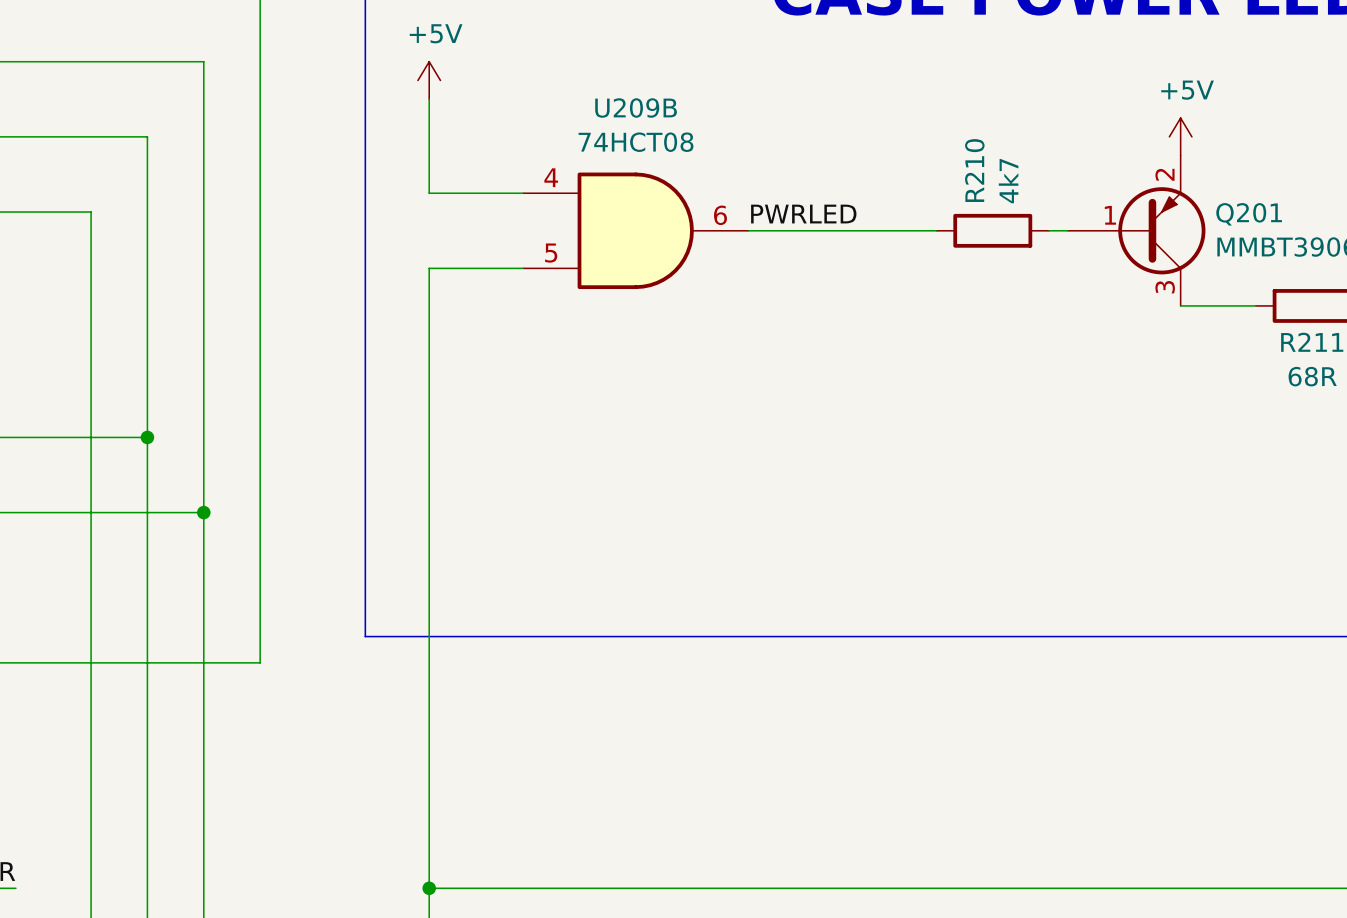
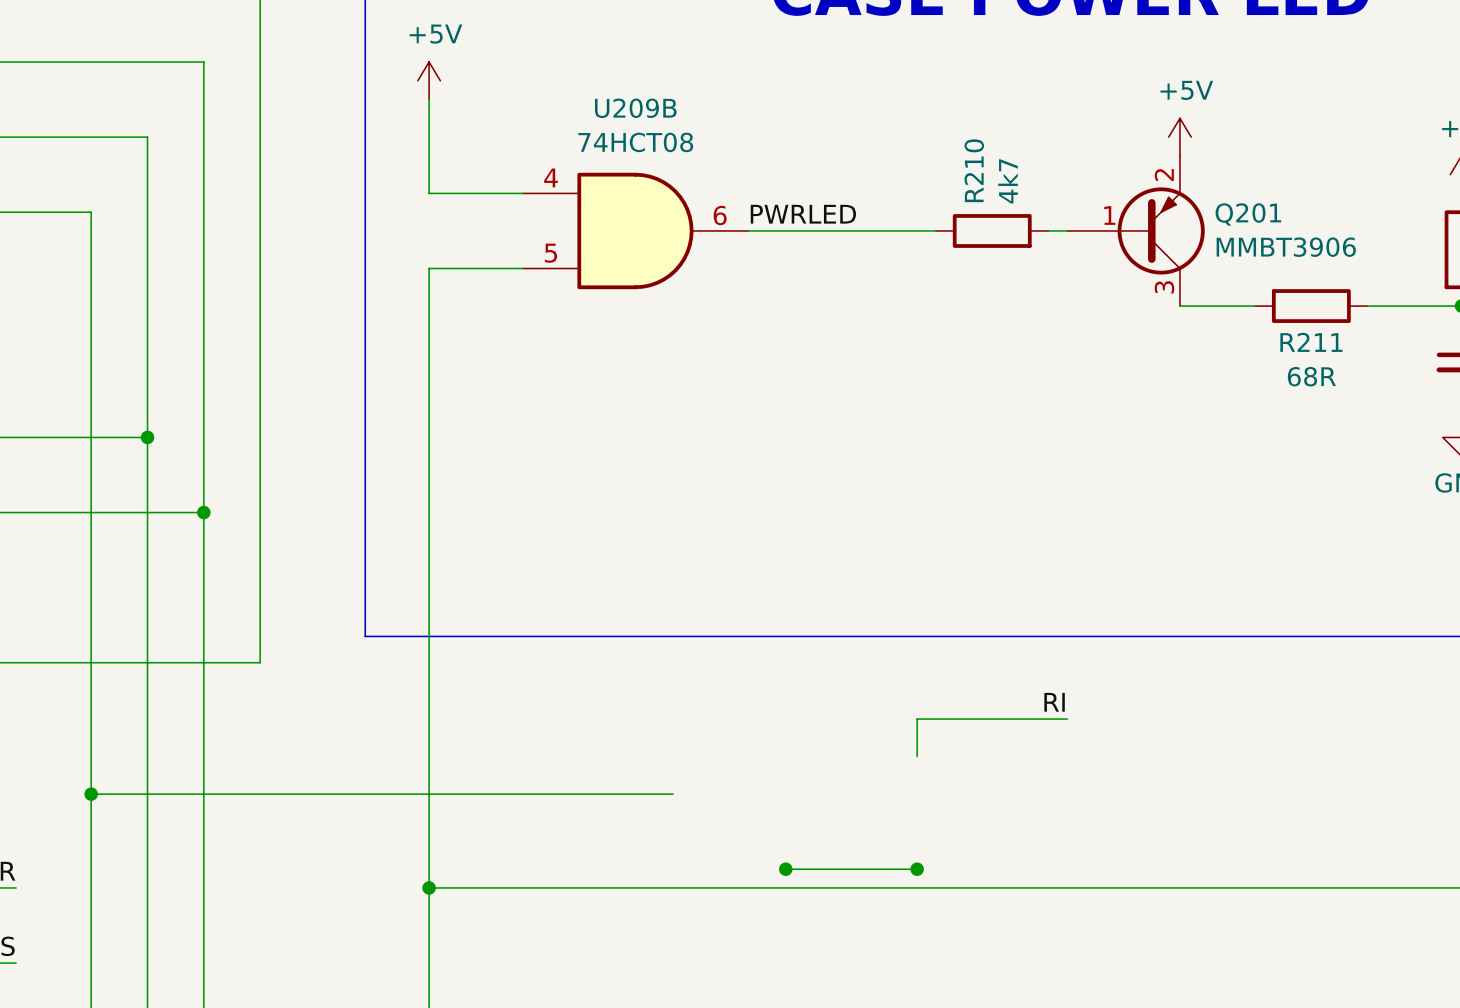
label: none -> RI (1054, 702)
wire: none -> (1067, 719) (917, 719) (917, 756)
wire: none -> (91, 794) (673, 794)
junction: none -> (91, 794)
wire: none -> (785, 869) (917, 869)
junction: none -> (785, 869)
junction: none -> (917, 869)

